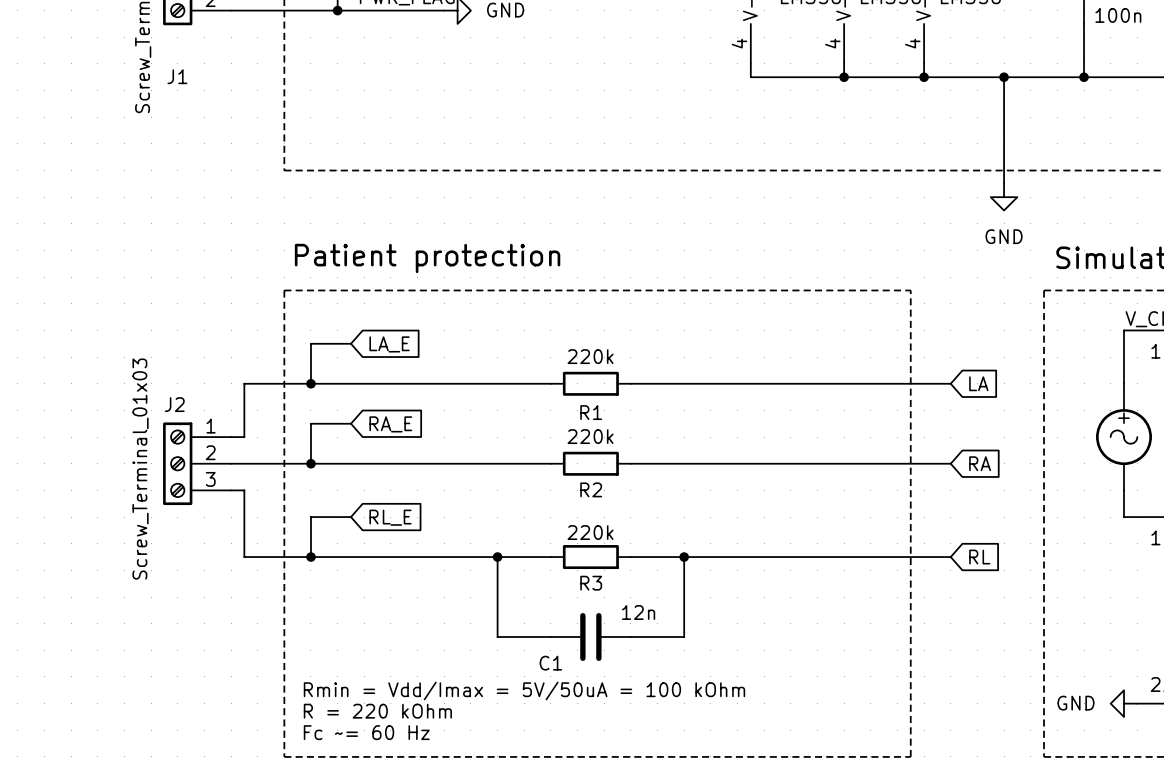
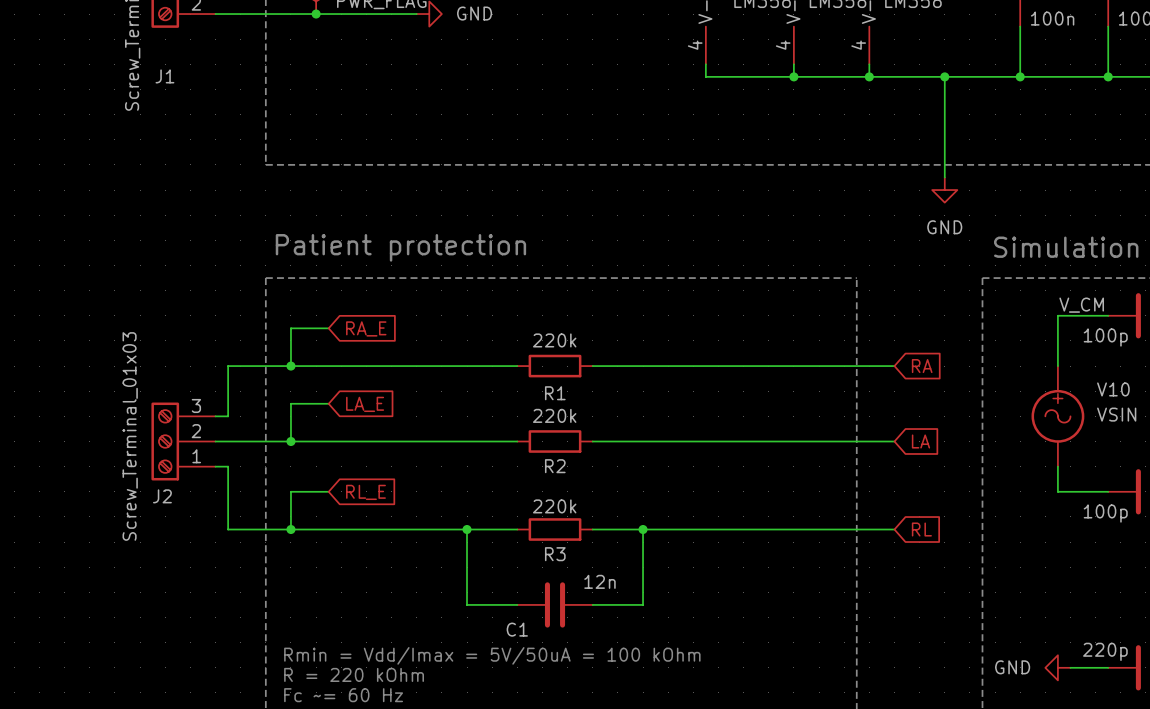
global label: LA_E (389, 344) -> RA_E (366, 328)
global label: LA (978, 383) -> RA (922, 366)
global label: RA_E (390, 424) -> LA_E (365, 404)
J2 flip: as is (177, 463) -> up-down (165, 441)
global label: RA (980, 463) -> LA (920, 441)

